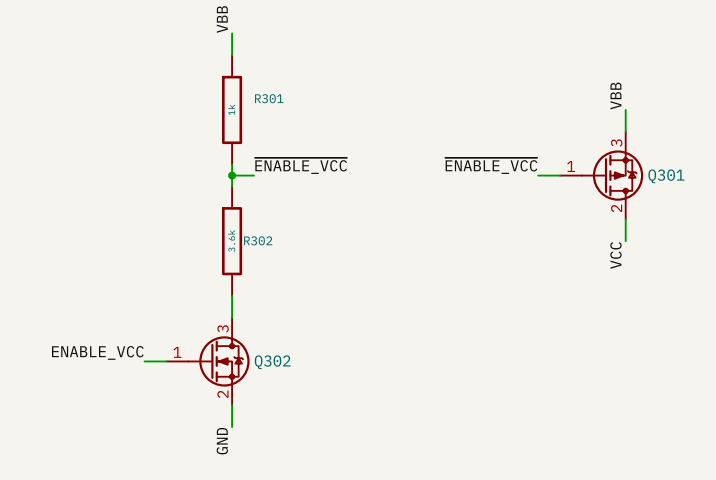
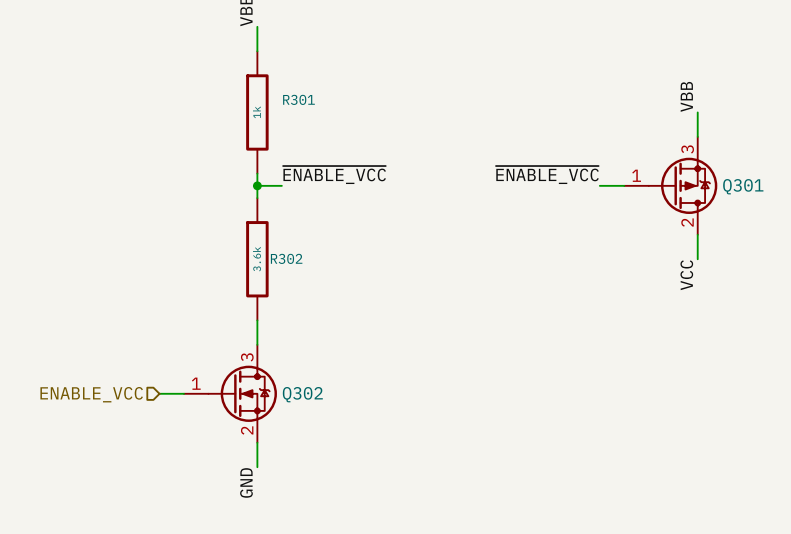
label: ENABLE_VCC (97, 352) -> none
hierarchical label: none -> ENABLE_VCC (91, 394)

